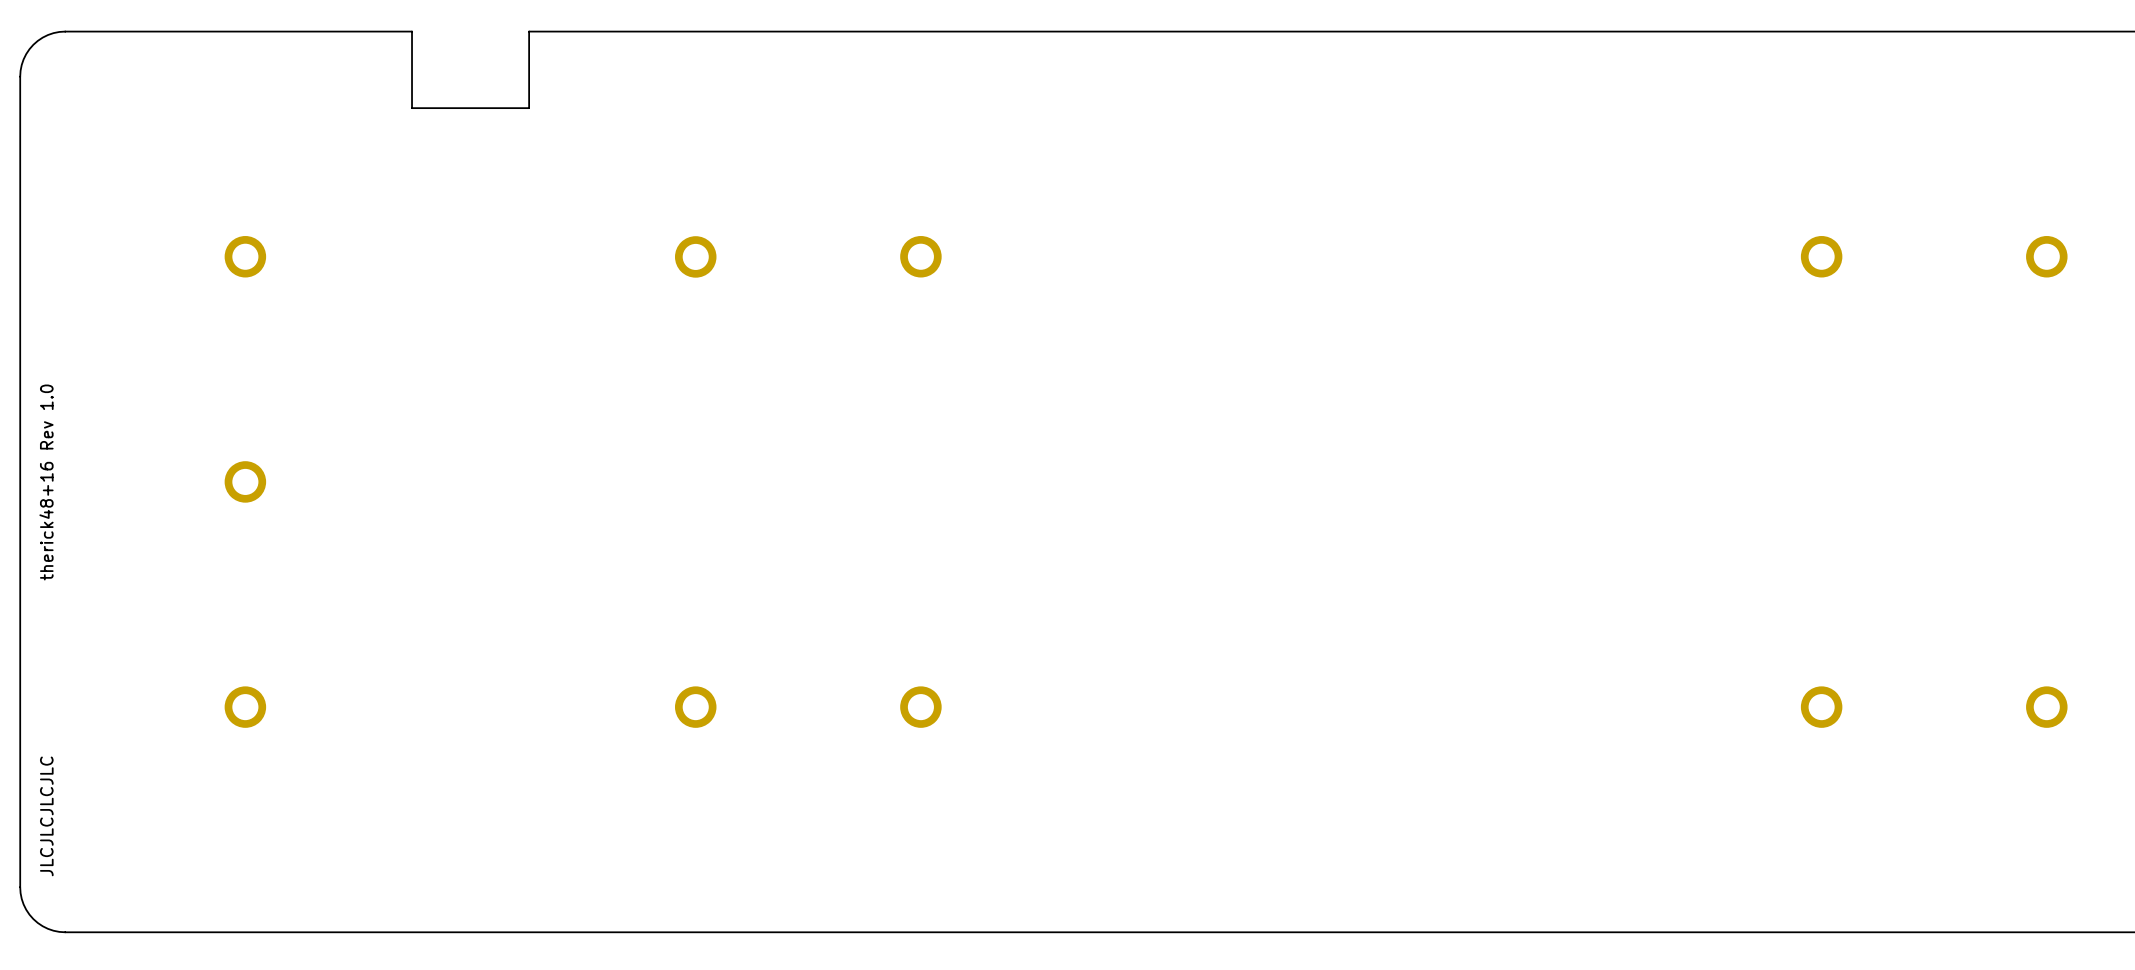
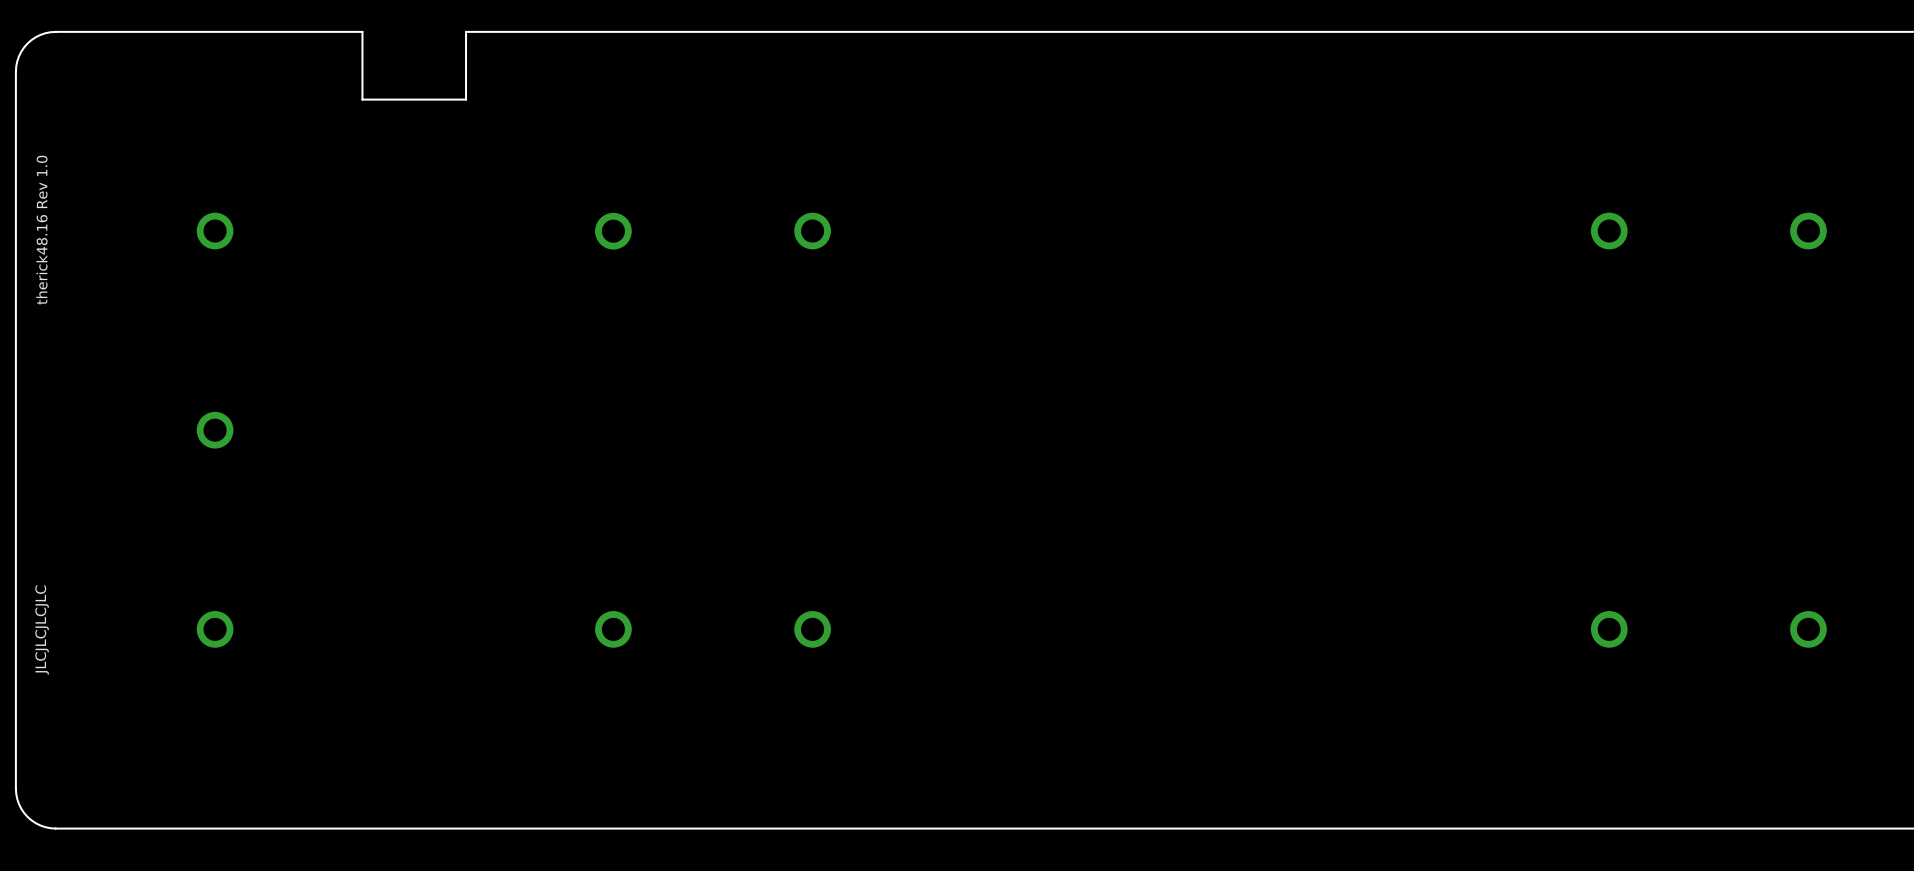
text: therick48+16 Rev 1.0 (46, 482) -> therick48.16 Rev 1.0 (41, 230)
text position: JLCJLCJLCJLC (46, 816) -> JLCJLCJLCJLC (42, 630)

